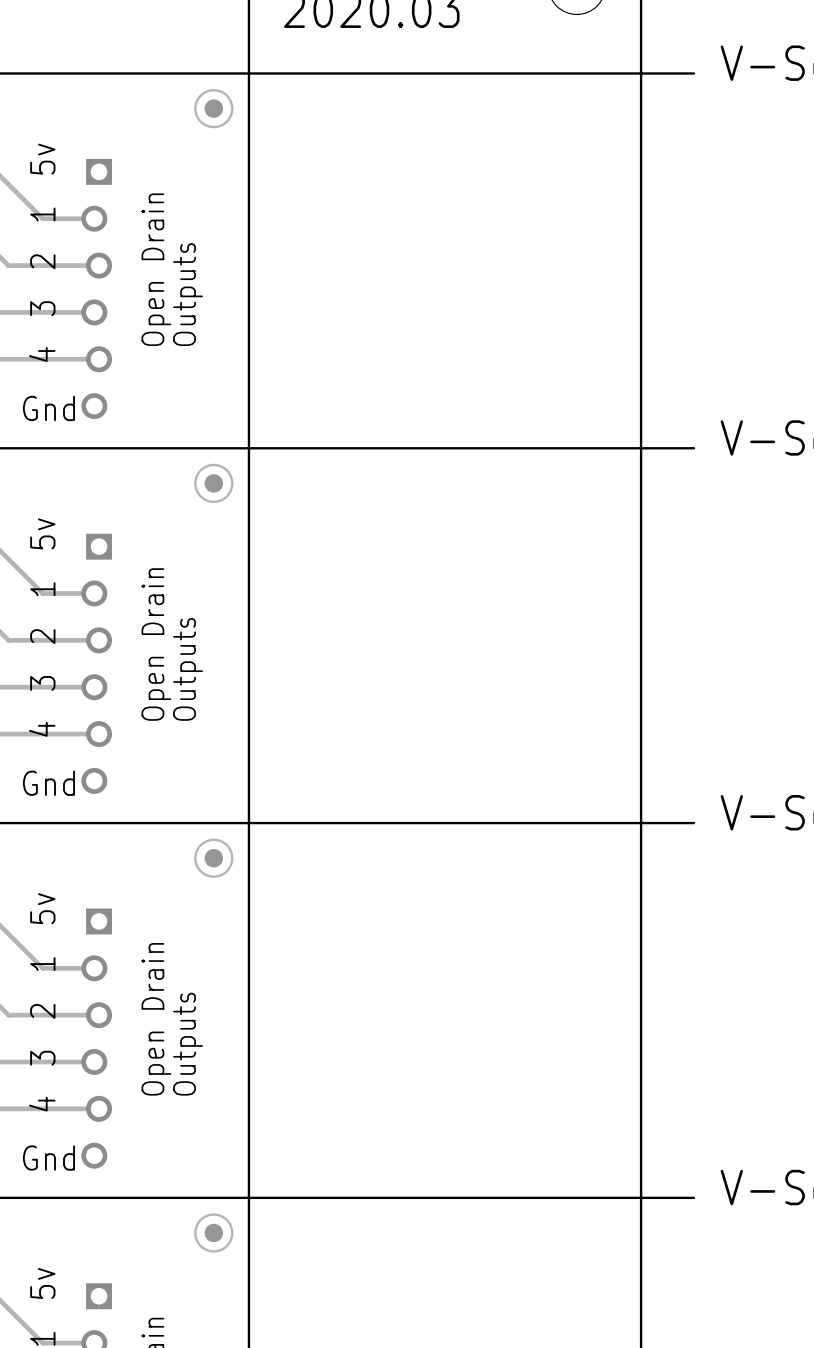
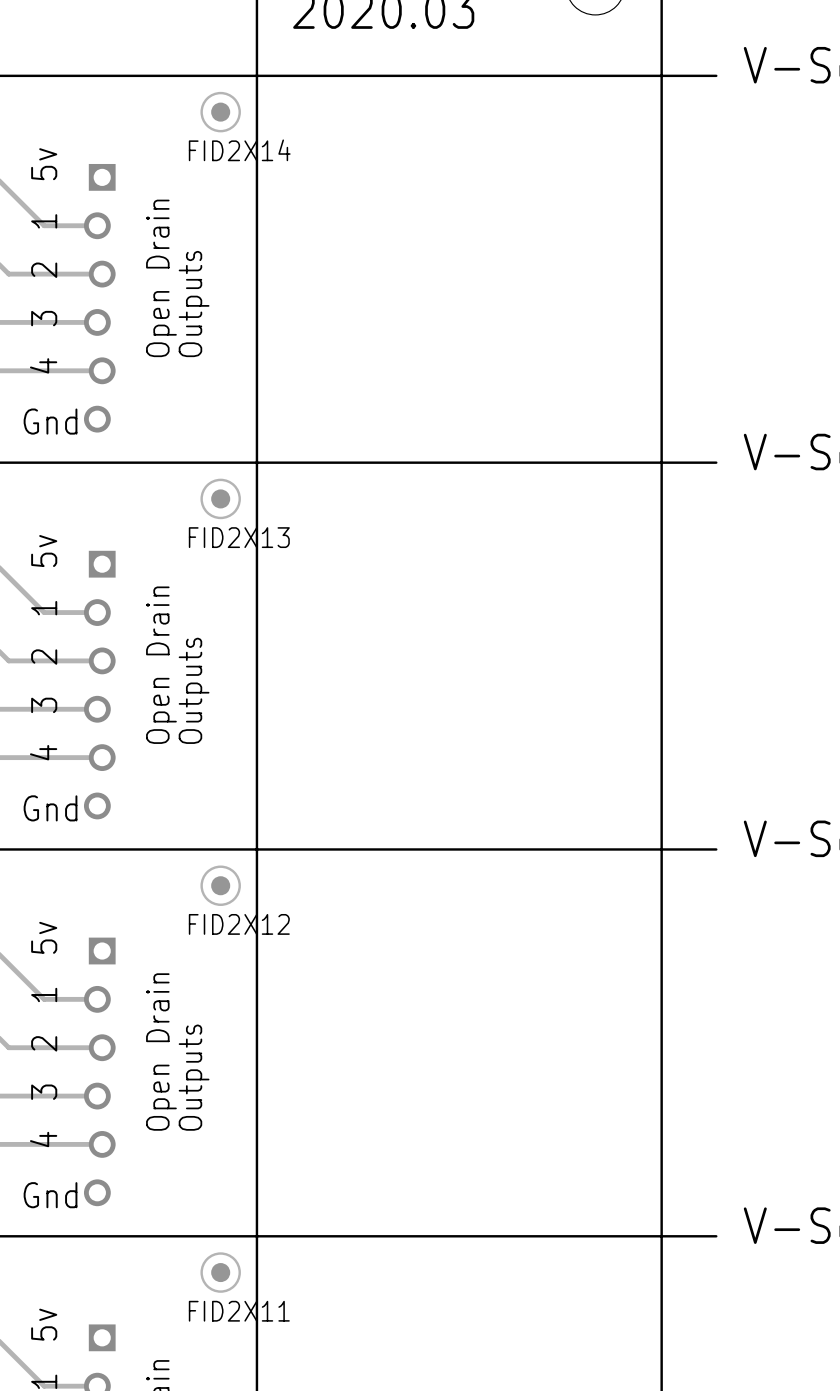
FID2X14 name: none -> FID2X14 (239, 150)
FID2X13 name: none -> FID2X13 (239, 537)
FID2X12 name: none -> FID2X12 (239, 924)
FID2X11 name: none -> FID2X11 (239, 1311)

